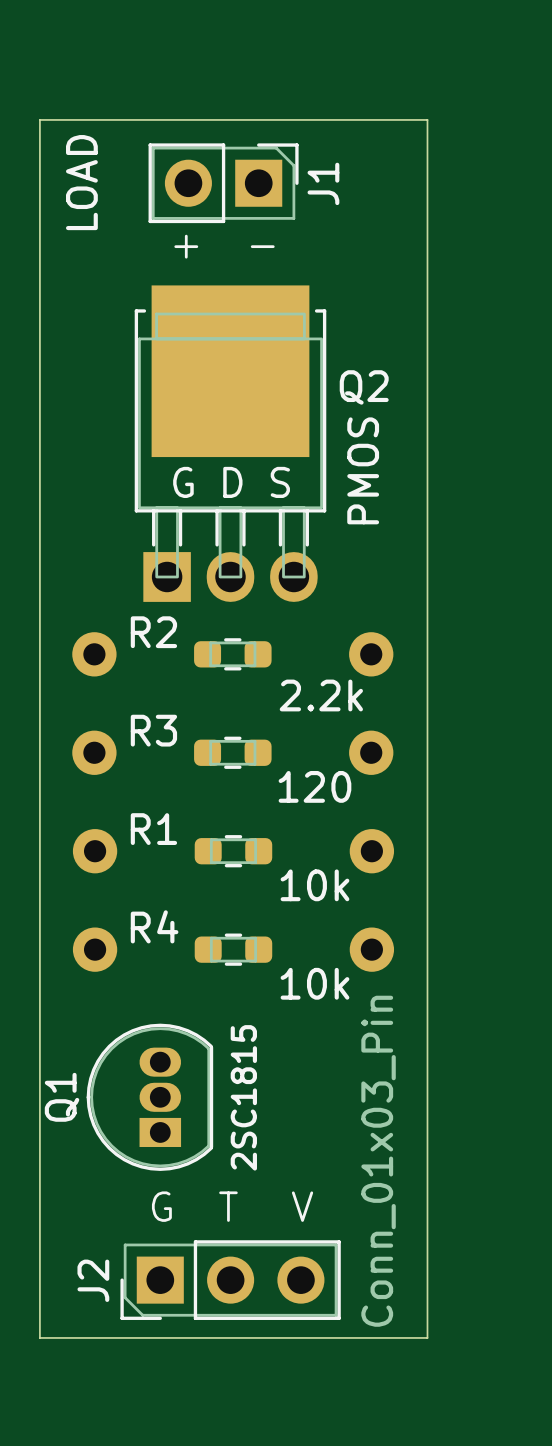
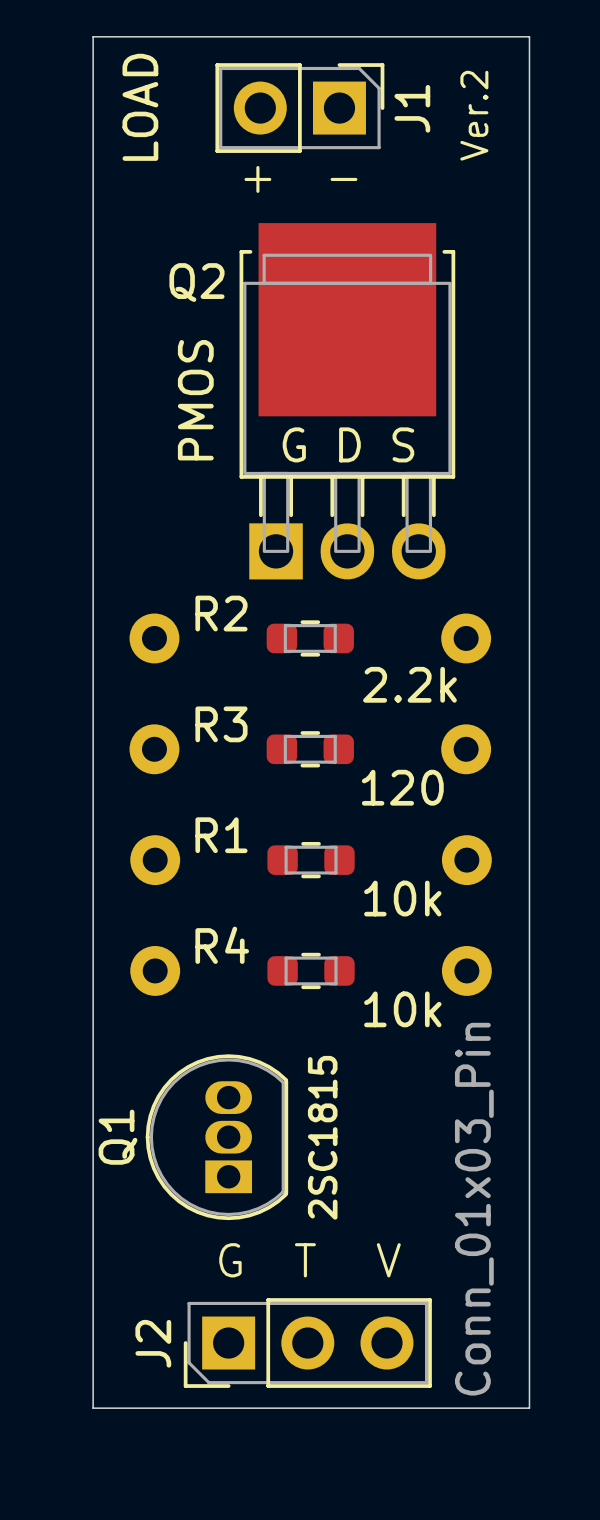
text: none -> Ver.2 (474, 115)
Q2 name position: Q2 (364, 387) -> Q2 (196, 282)
Q2 position: (230, 443) -> (347, 401)
Q2 value position: PMOS (363, 470) -> PMOS (195, 400)
text position: G D S (231, 482) -> G D S (348, 444)

